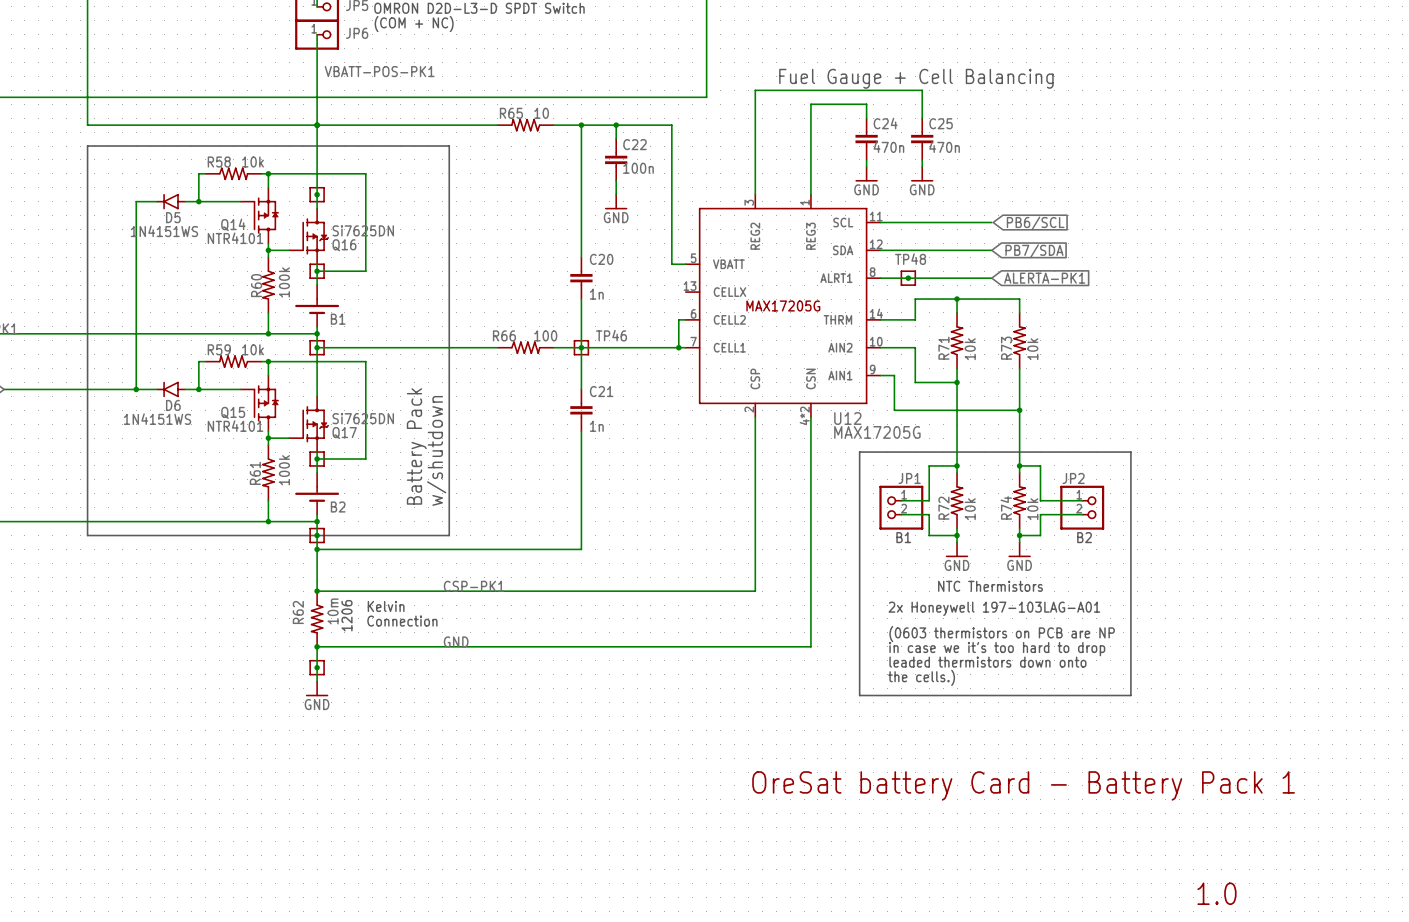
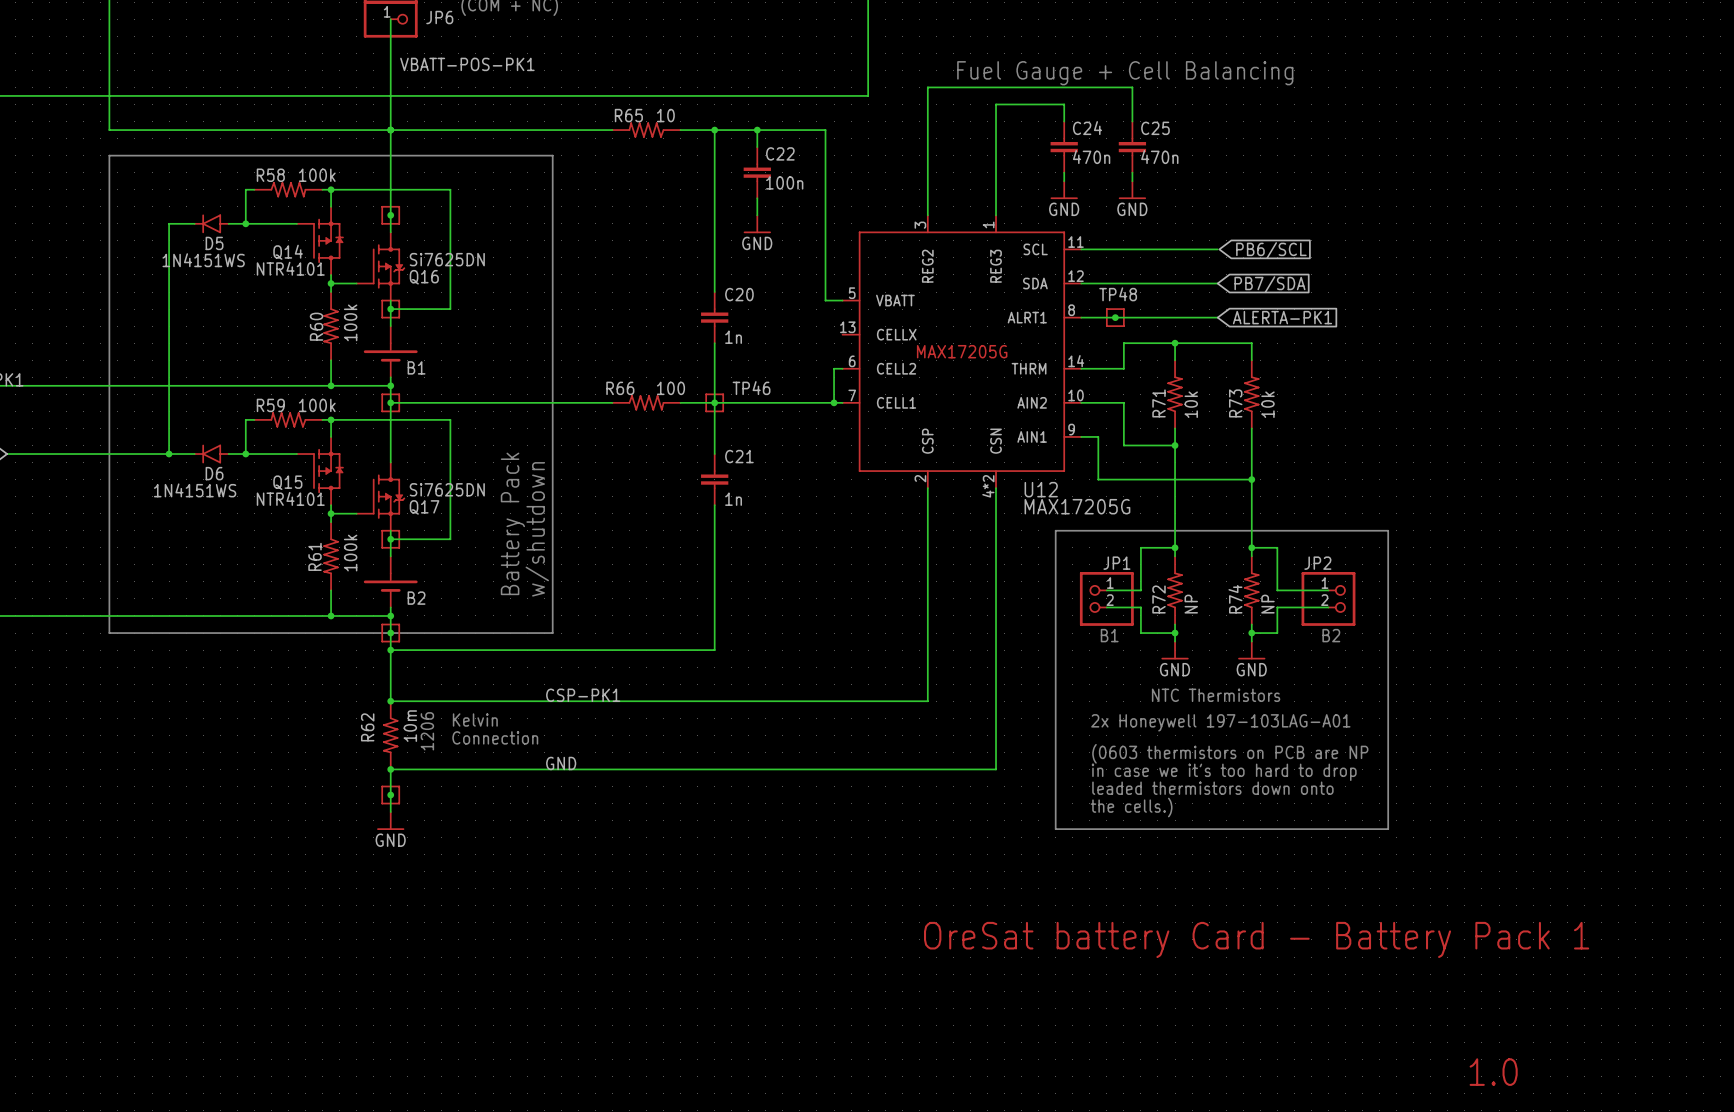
R58 value: 10k (252, 162) -> 100k (317, 175)
R59 value: 10k (252, 349) -> 100k (317, 405)
R72 value: 10k (970, 509) -> NP (1191, 604)
R74 value: 10k (1032, 509) -> NP (1267, 604)

